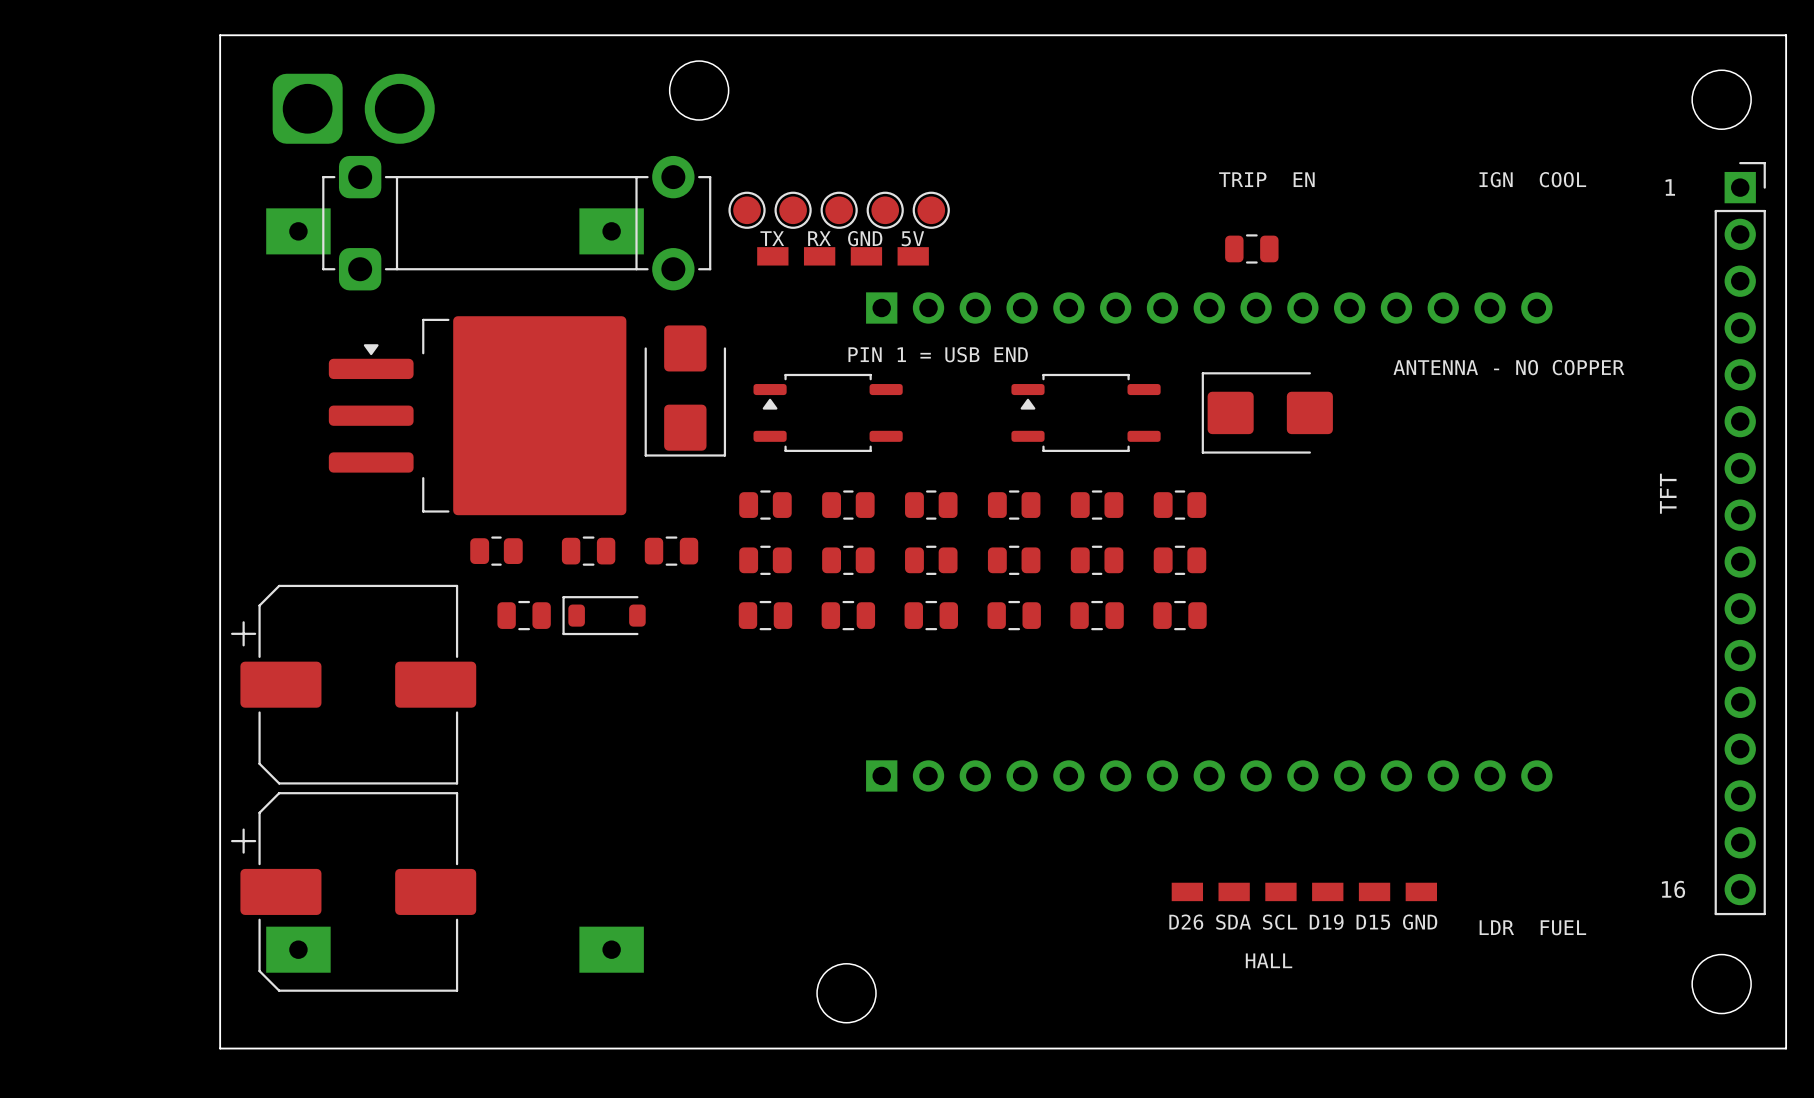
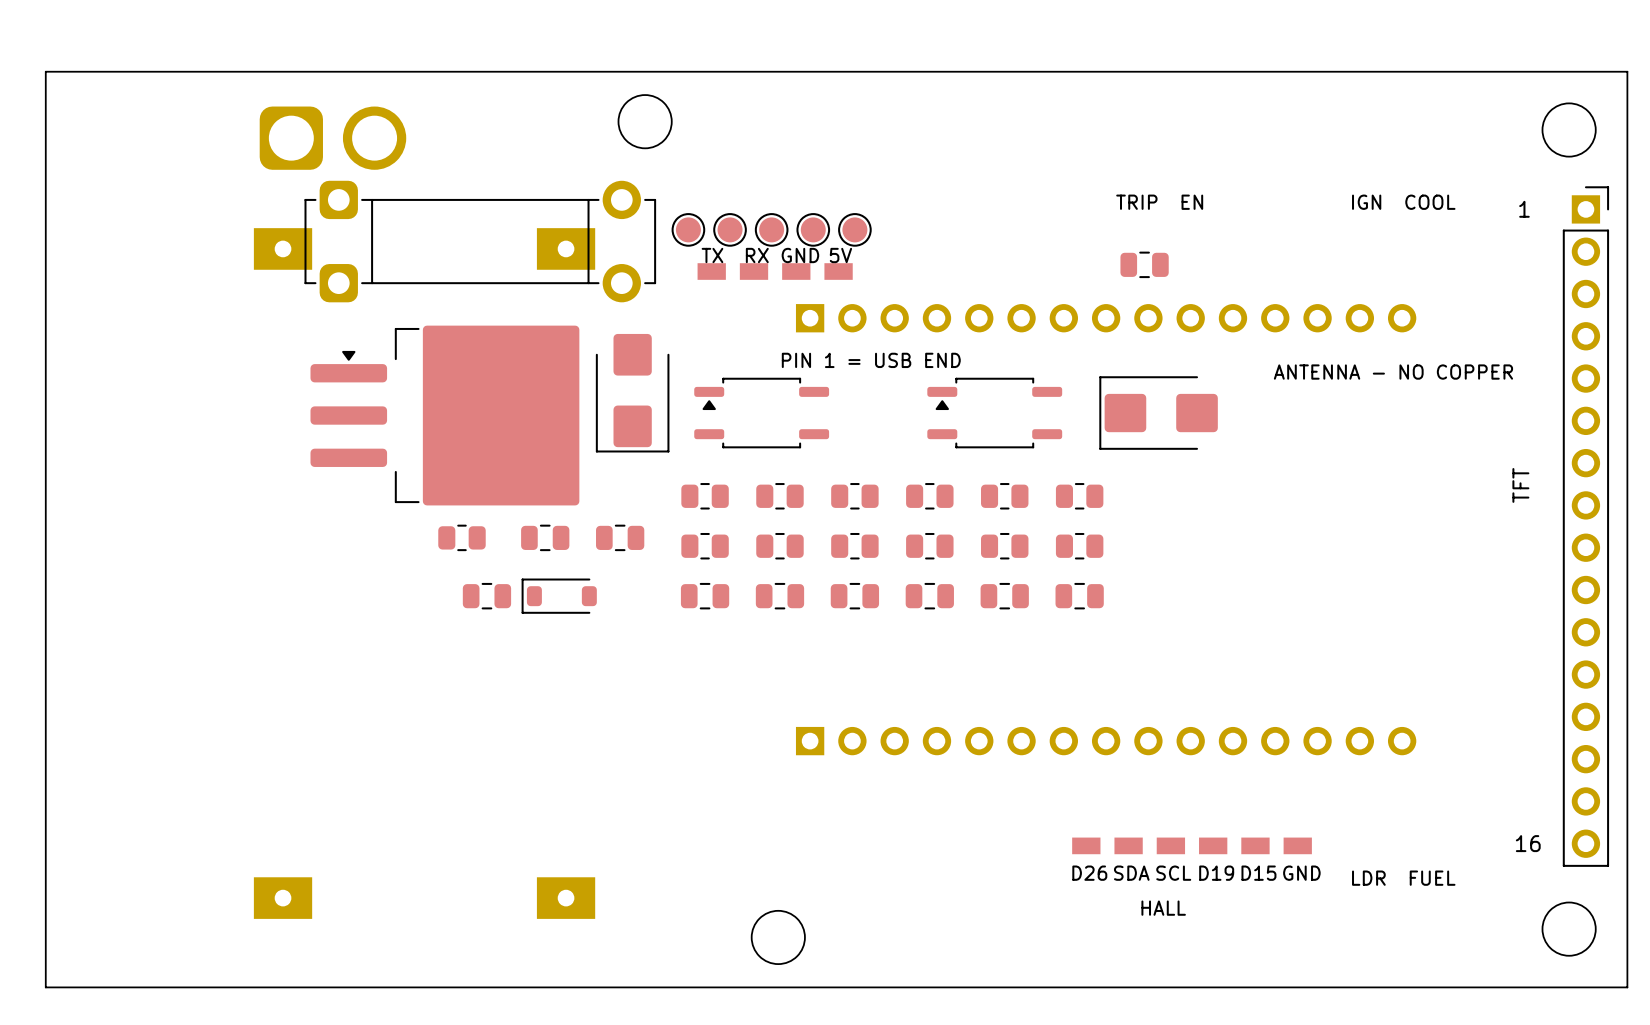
board edge: (220, 35) (220, 1048) -> (212, 71) (45, 71) (45, 987) (212, 987)
part: (353, 684) -> none
part: (353, 891) -> none

